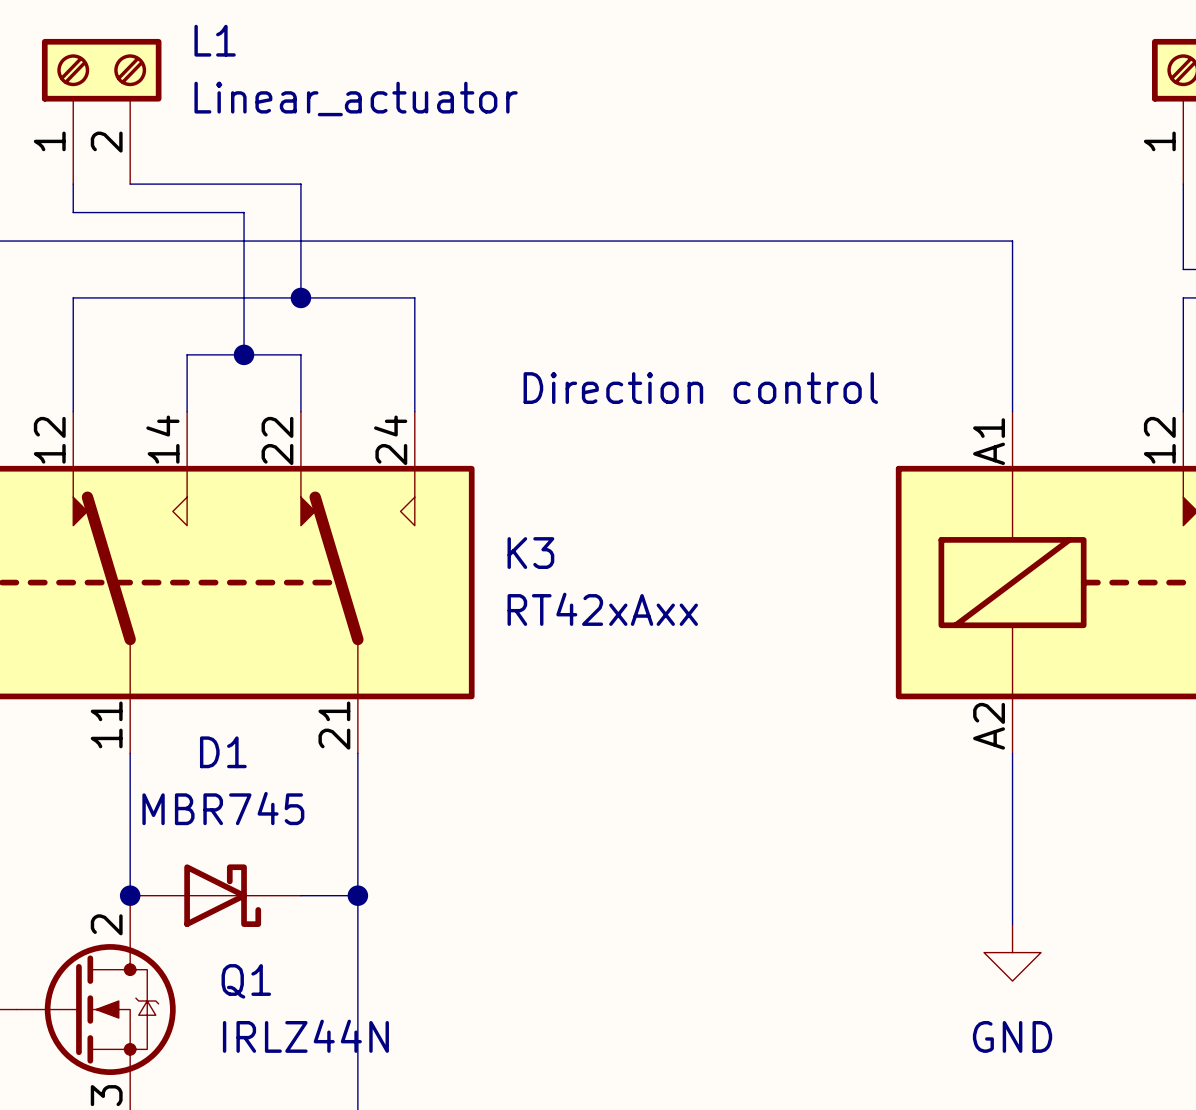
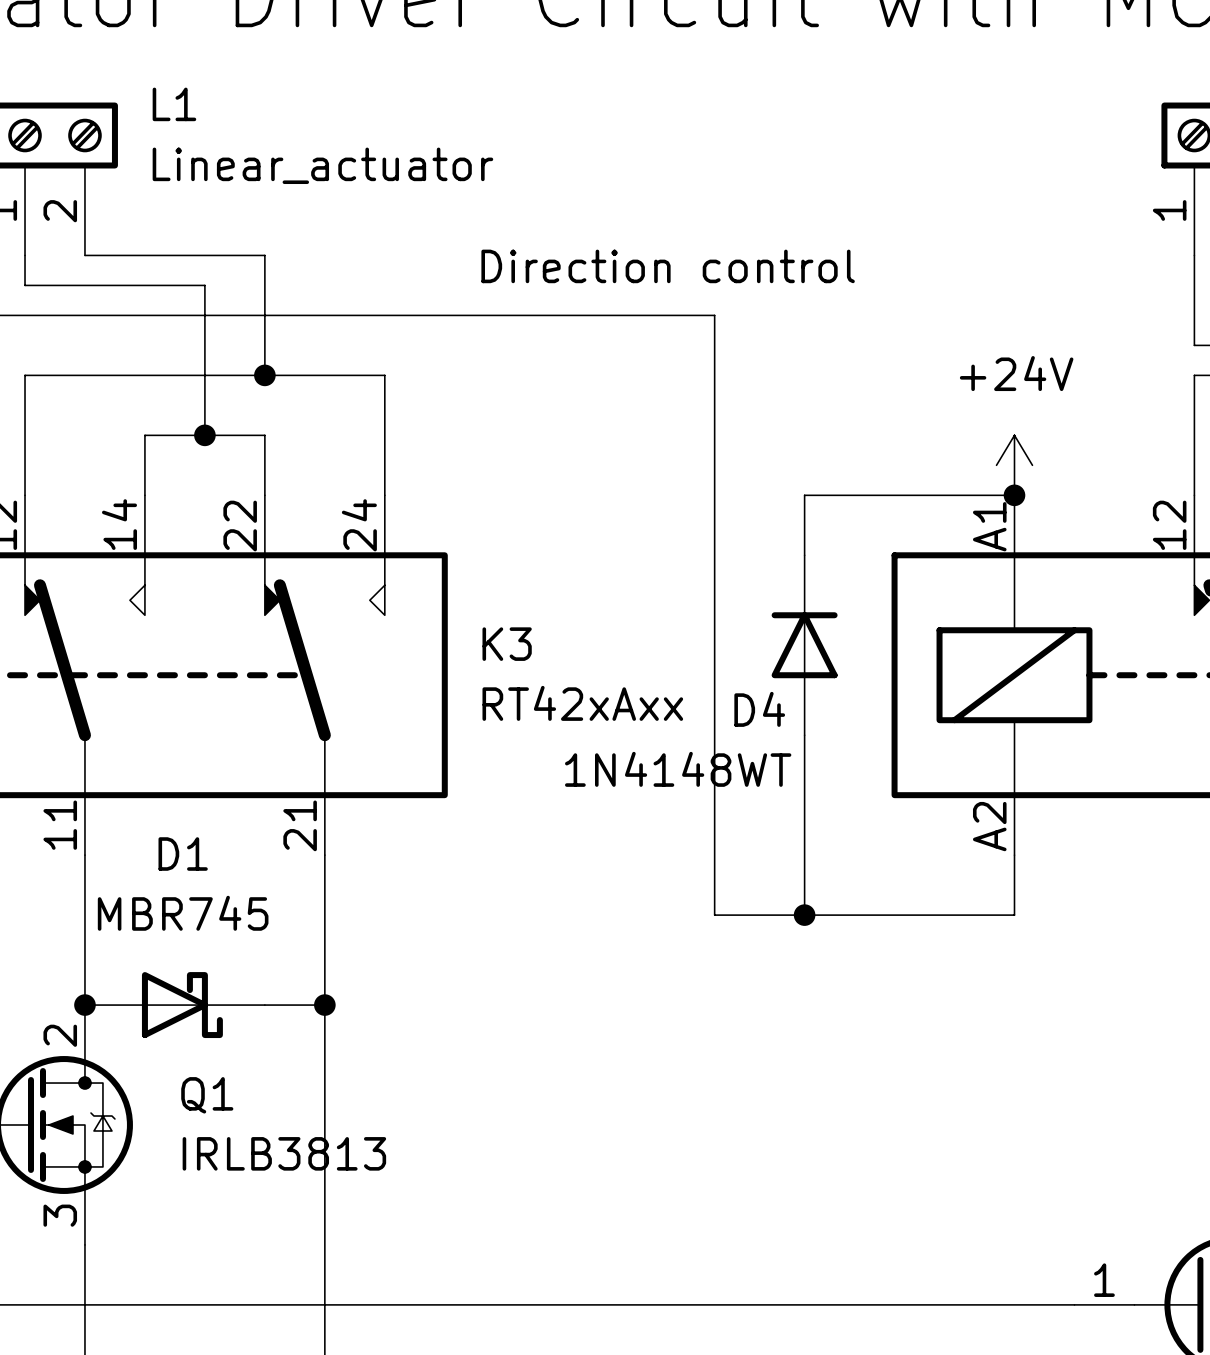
wire: (727, 241) (1012, 241) (1012, 411) -> (804, 555) (804, 495) (1014, 495)
power symbol: none -> +24V (1014, 465)
text position: Direction control (700, 388) -> Direction control (668, 266)
junction: none -> (1014, 495)
D4: none -> 1N4148WT (804, 645)
wire: none -> (804, 735) (804, 915)
junction: none -> (804, 915)
wire: (1012, 810) (1012, 924) -> (1014, 915) (714, 915) (714, 315)
power symbol: GND (1012, 952) -> none
Q1 value: IRLZ44N (305, 1036) -> IRLB3813 (284, 1153)

